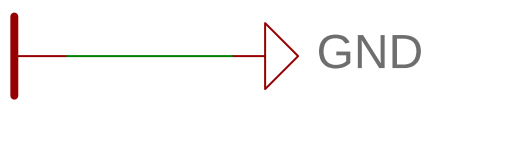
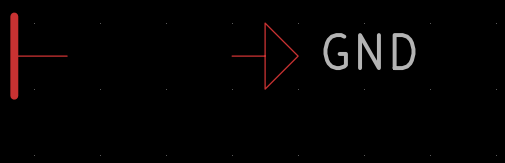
wire: (67, 56) (232, 56) -> none

